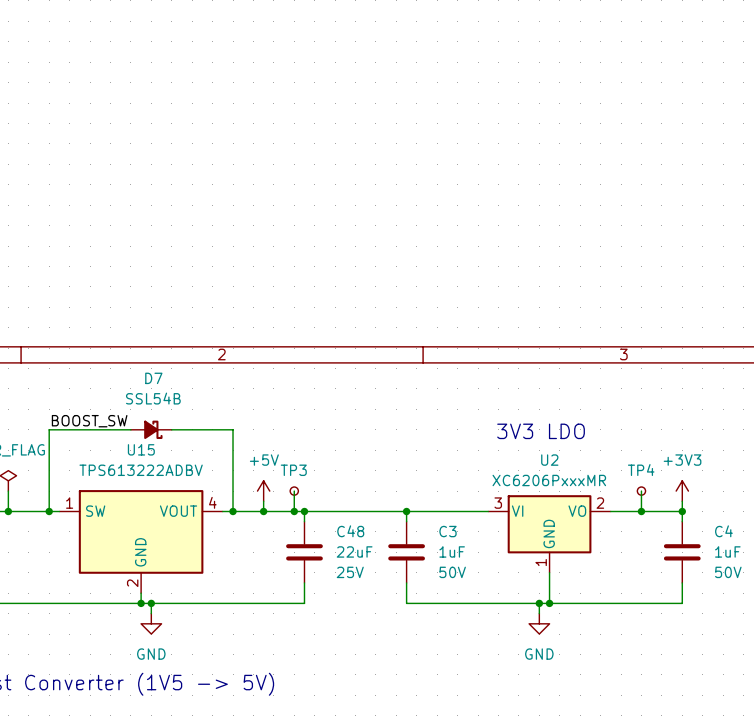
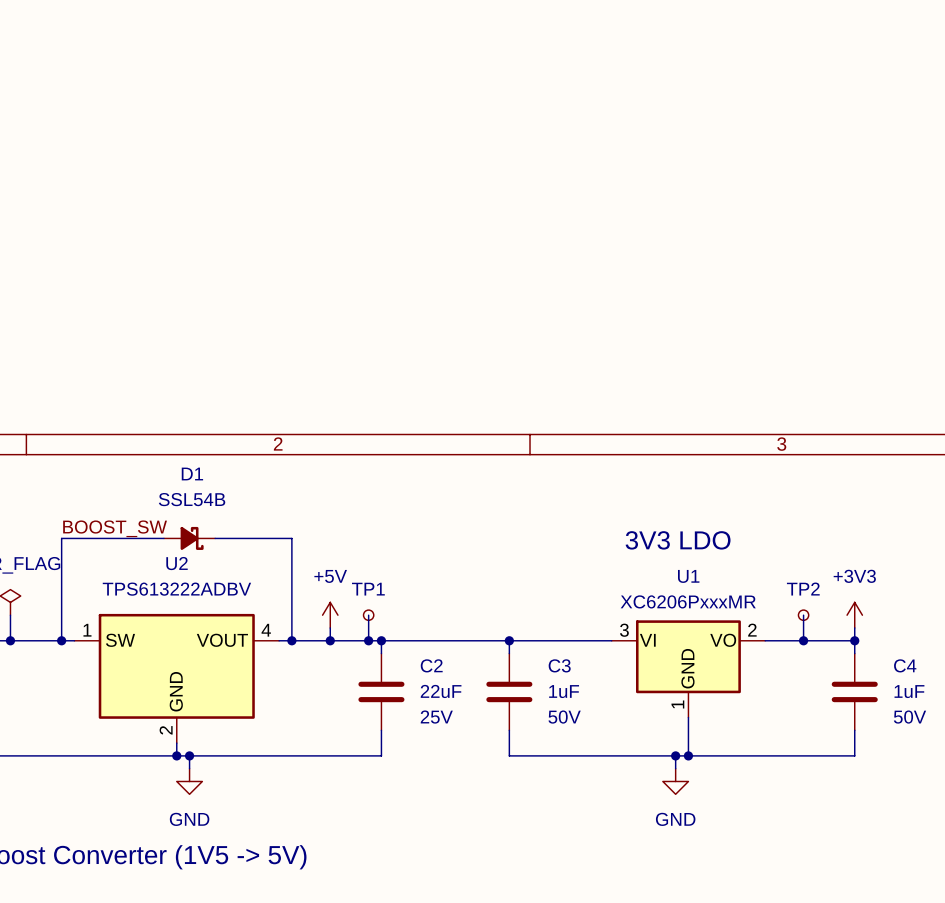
D7 name: D7 (153, 378) -> D1 (192, 474)
U15 name: U15 (141, 449) -> U2 (177, 563)
U2 name: U2 (549, 460) -> U1 (688, 576)
TP3 name: TP3 (293, 470) -> TP1 (368, 589)
TP4 name: TP4 (641, 470) -> TP2 (803, 589)
C48 name: C48 (350, 531) -> C2 (431, 665)

